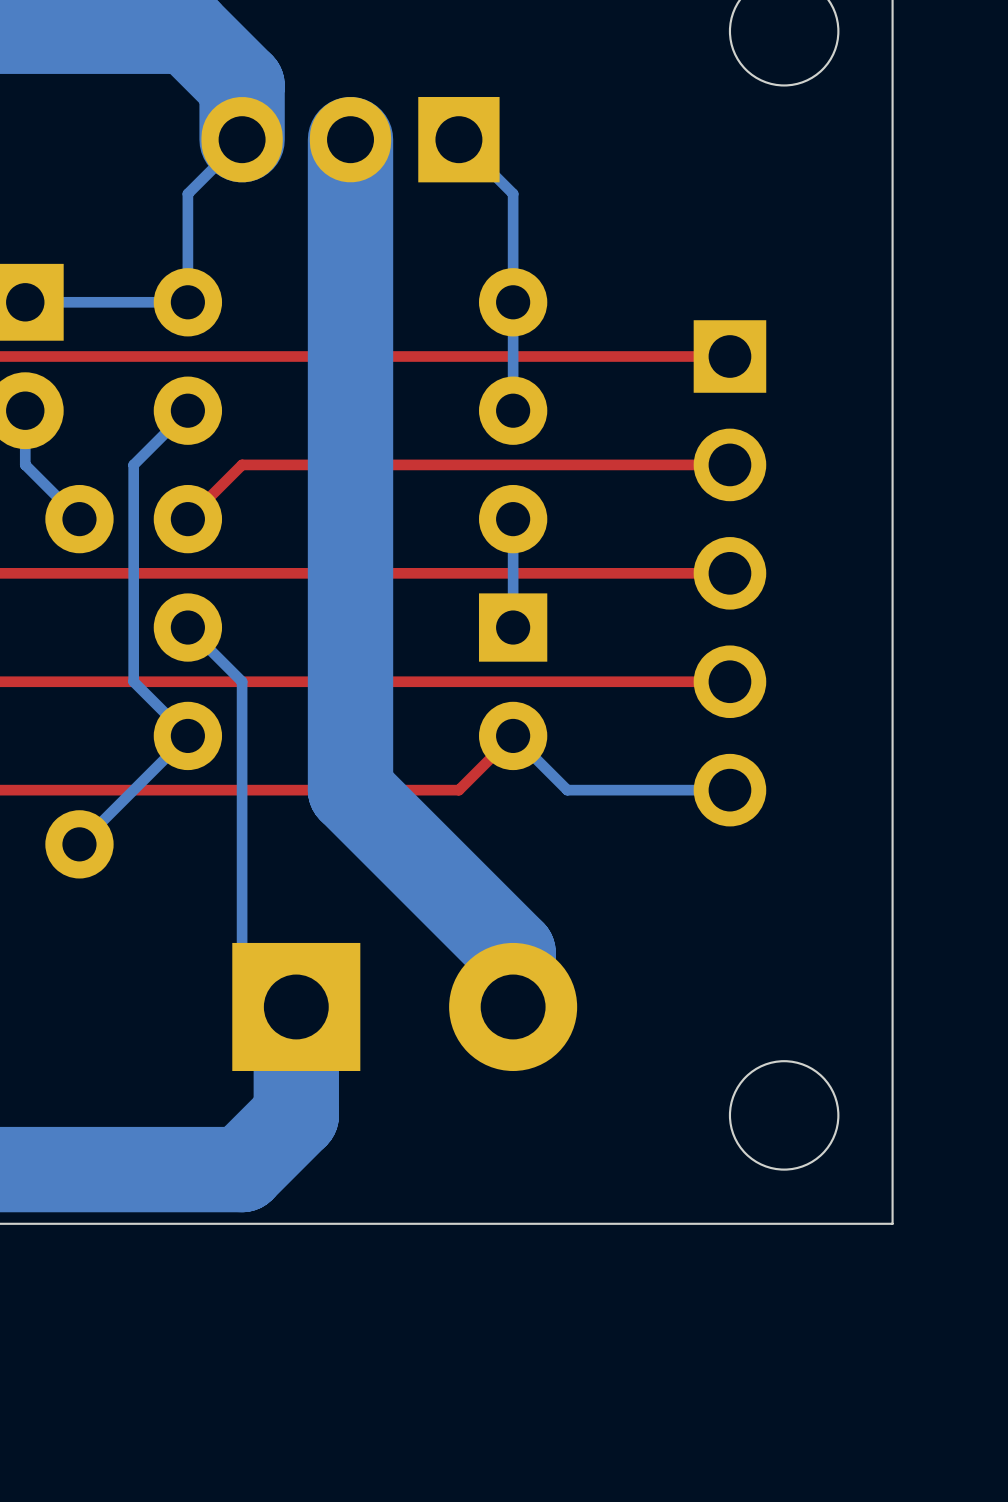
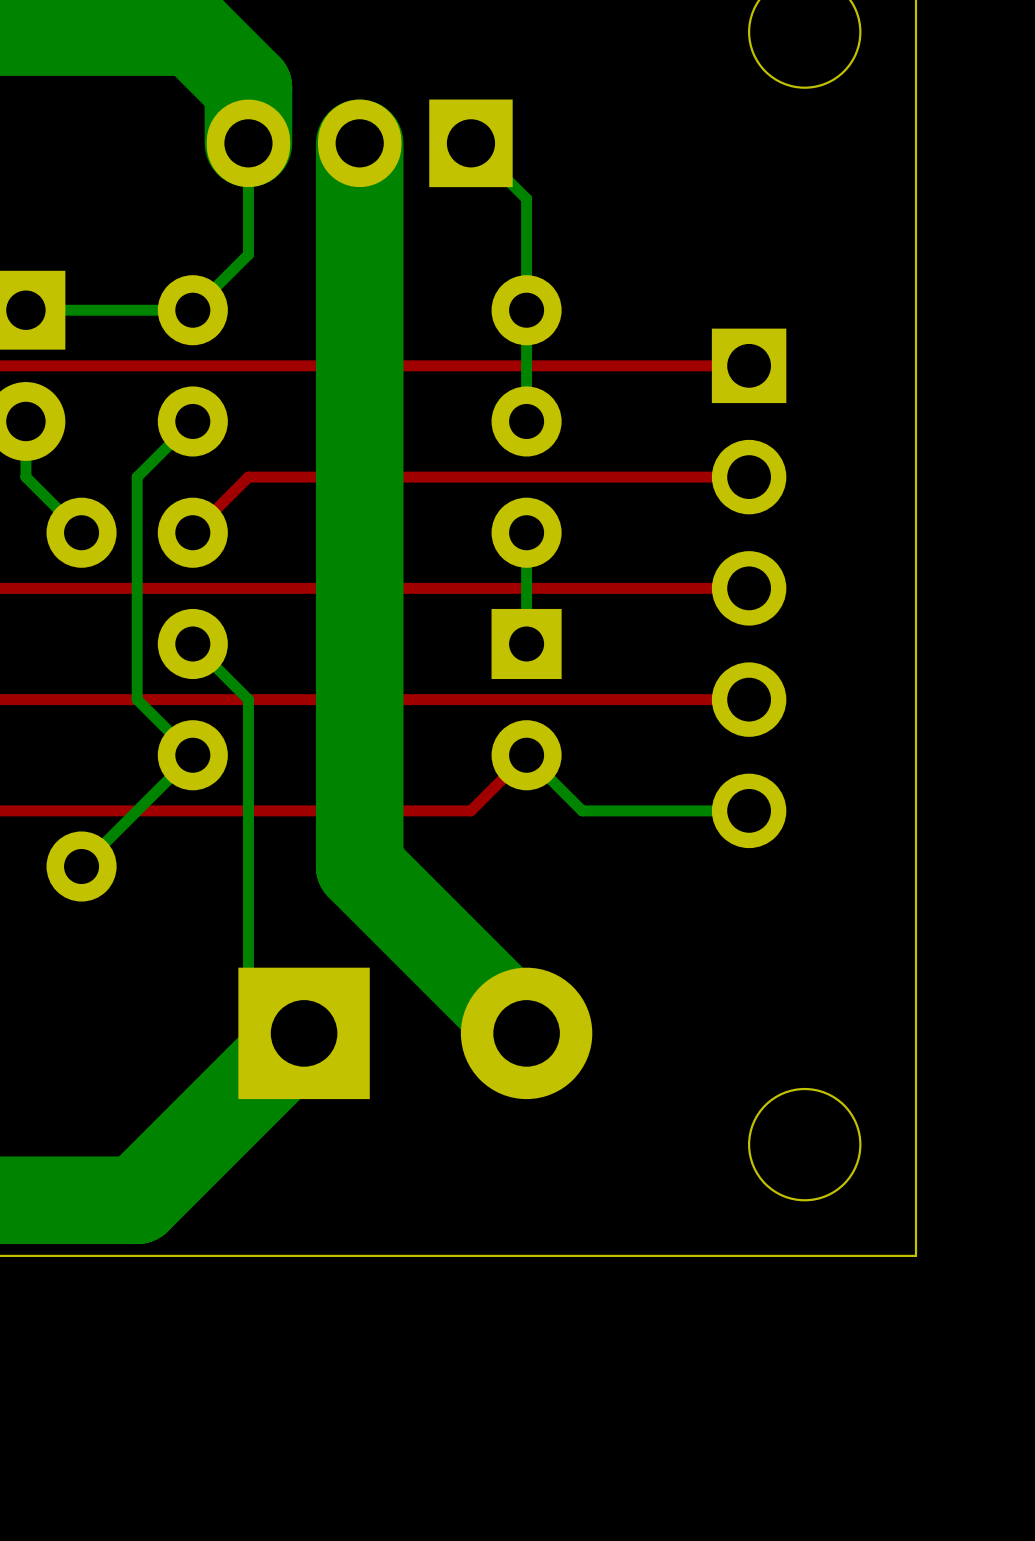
bottom track: (242, 139) (187, 193) (187, 302) -> (248, 143) (248, 254) (192, 310)
bottom track: (350, 790) (513, 952) (513, 1006) -> (359, 810) (359, 866) (526, 1033)
bottom track: (296, 1006) (296, 1115) (242, 1169) (133, 1169) -> (304, 1033) (137, 1200)

